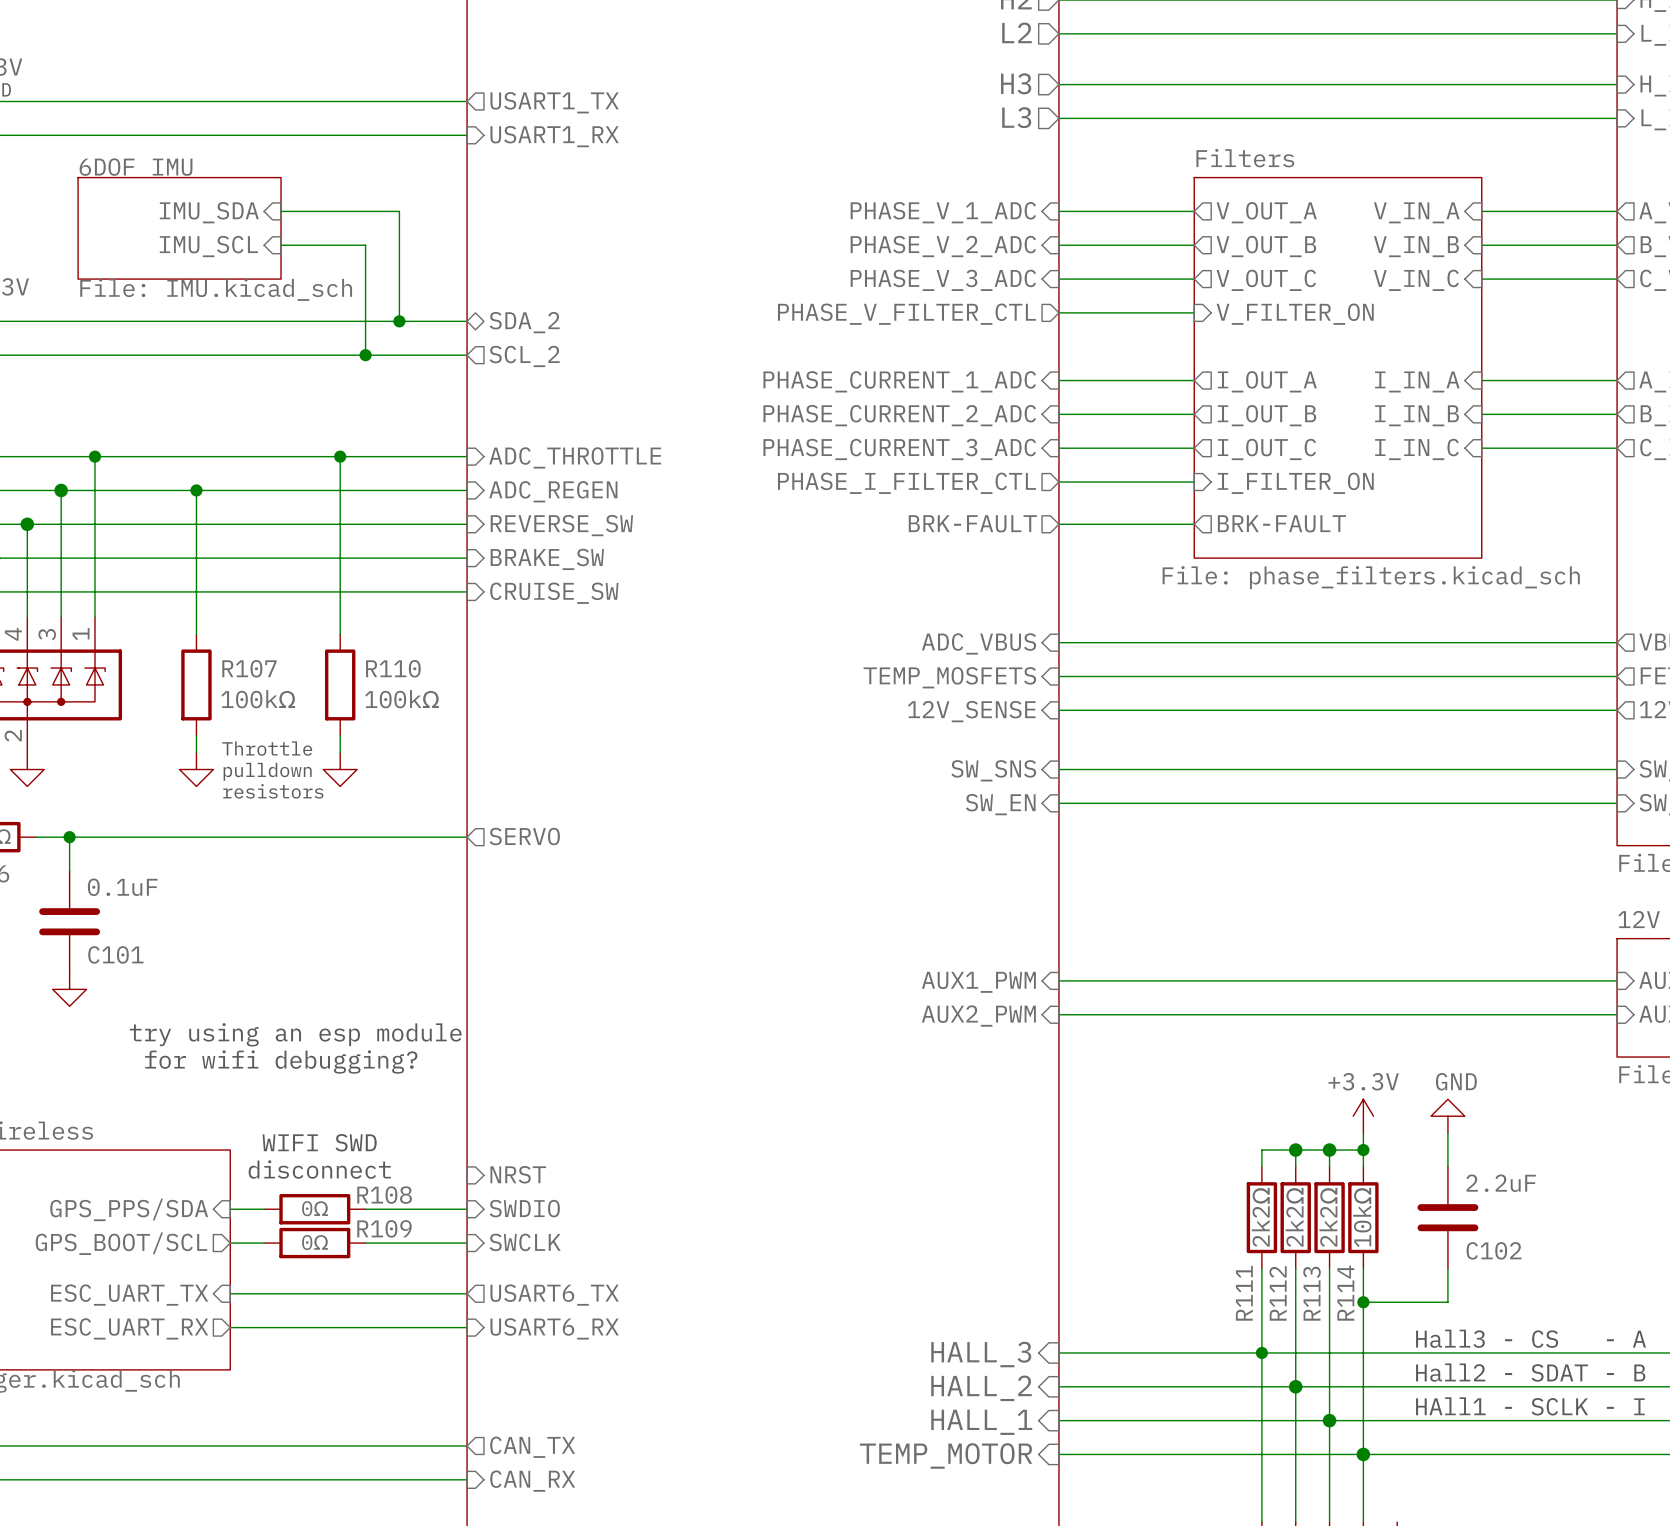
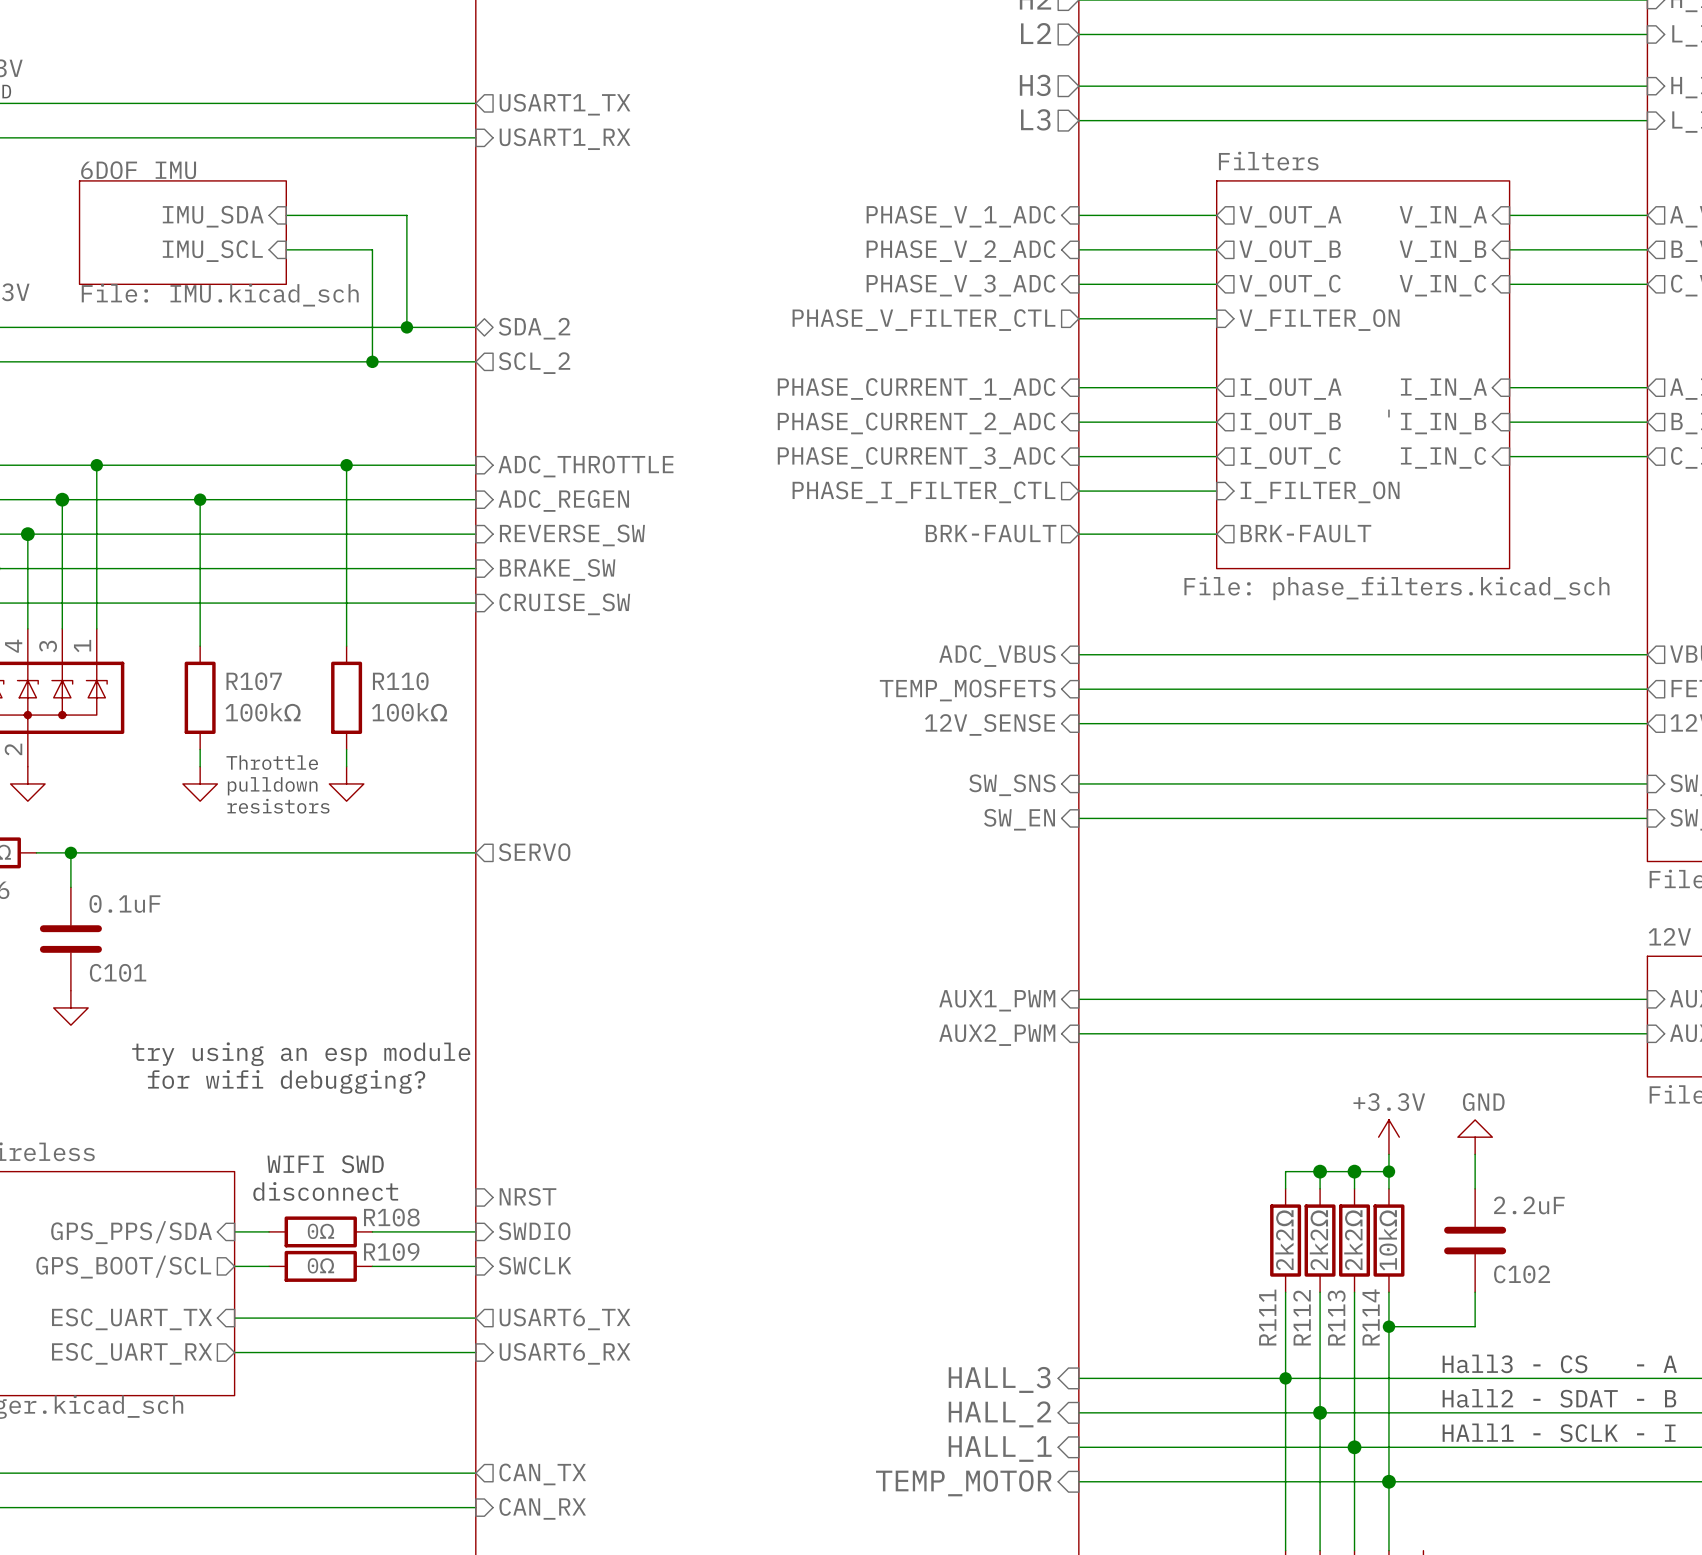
bus: none -> (1388, 410) (1388, 416)

